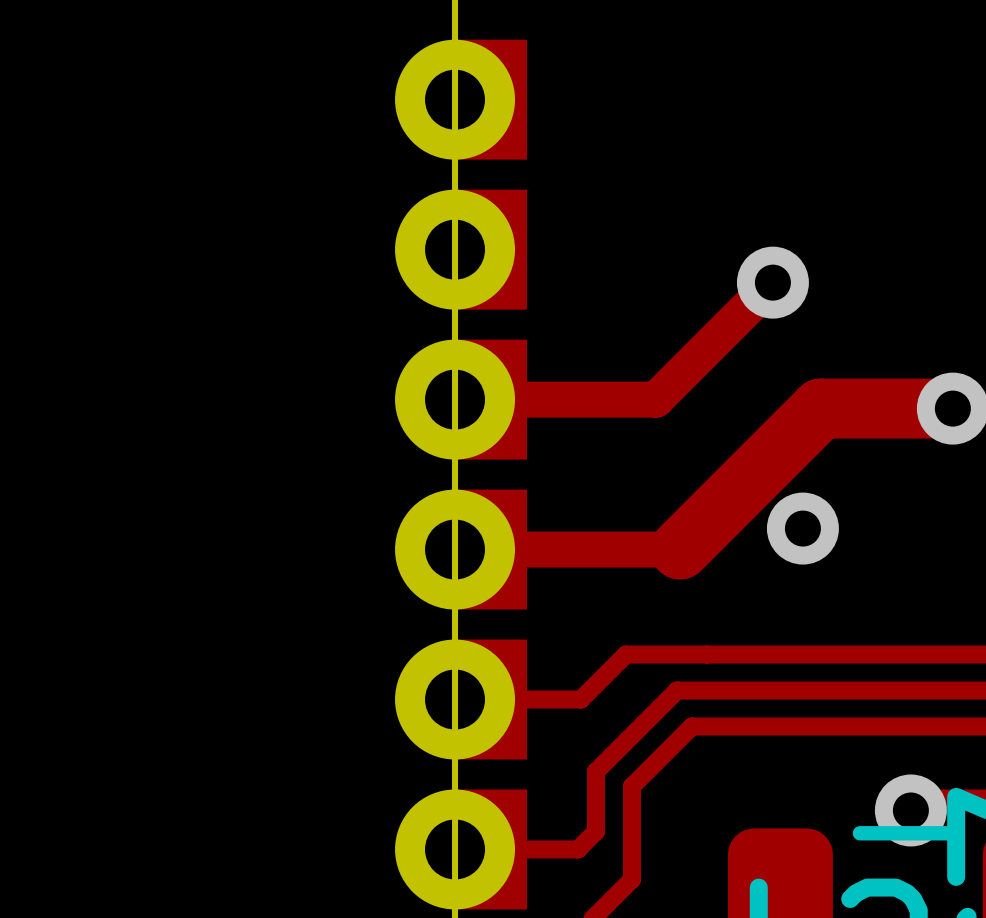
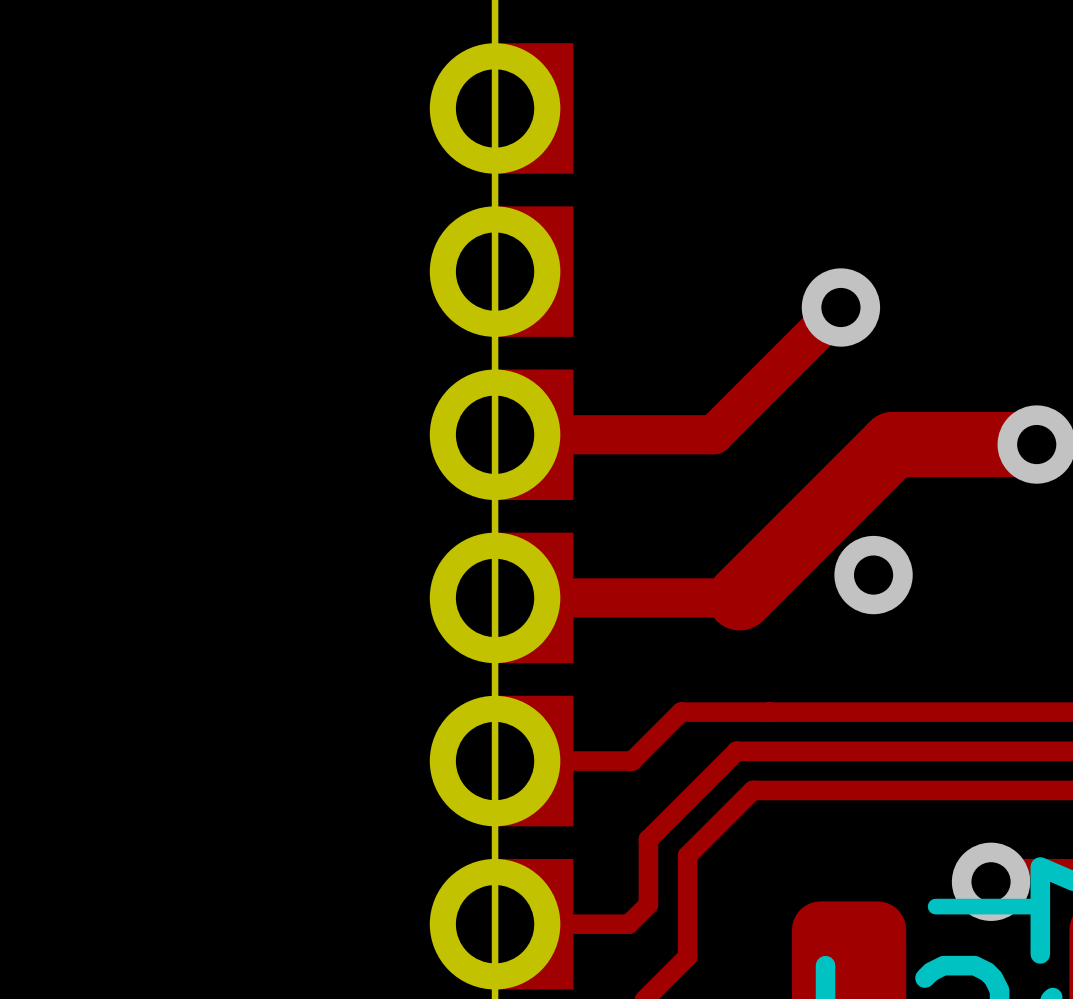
part footprint: [395, 39, 528, 160] -> [429, 43, 574, 174]
part footprint: [395, 189, 528, 310] -> [429, 206, 574, 337]
part footprint: [395, 339, 528, 460] -> [429, 369, 574, 501]
part footprint: [395, 489, 528, 610] -> [429, 532, 574, 664]
part footprint: [395, 639, 528, 760] -> [429, 695, 574, 827]
part footprint: [395, 789, 528, 910] -> [429, 858, 574, 990]

